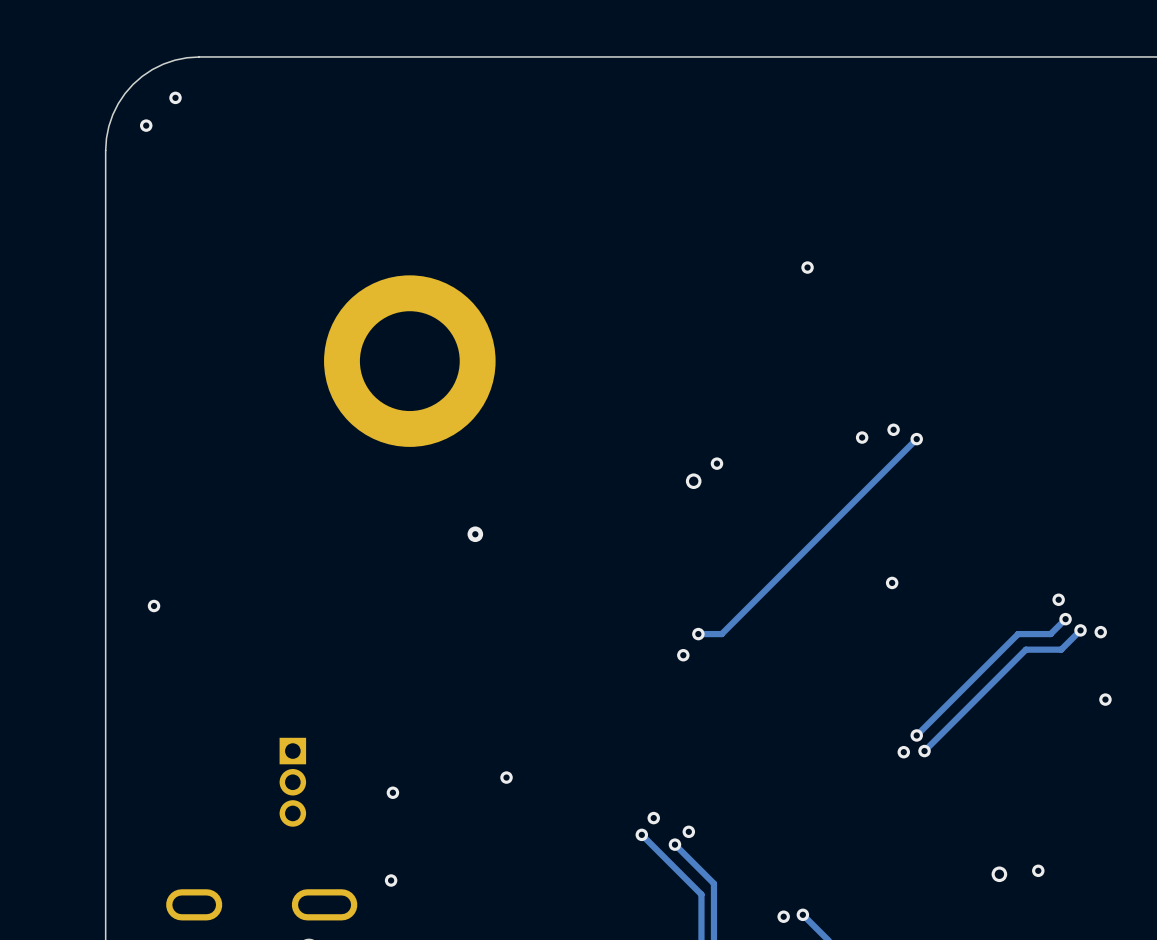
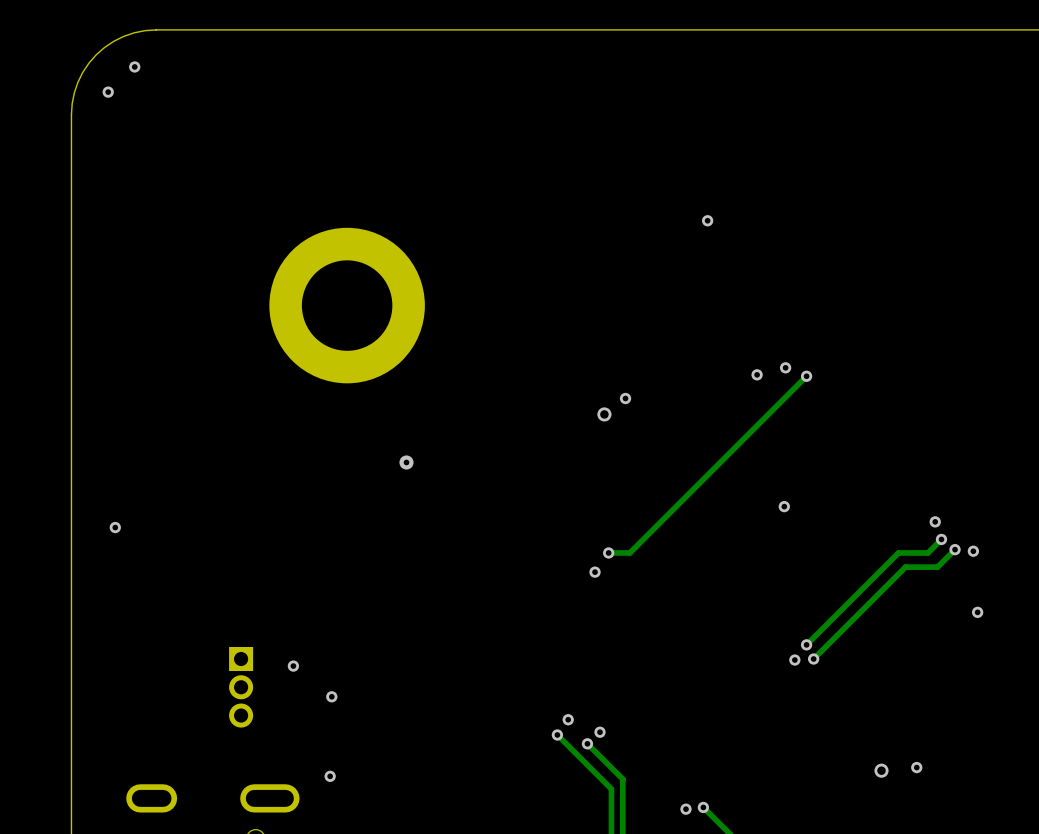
via position: (506, 777) -> (293, 666)

